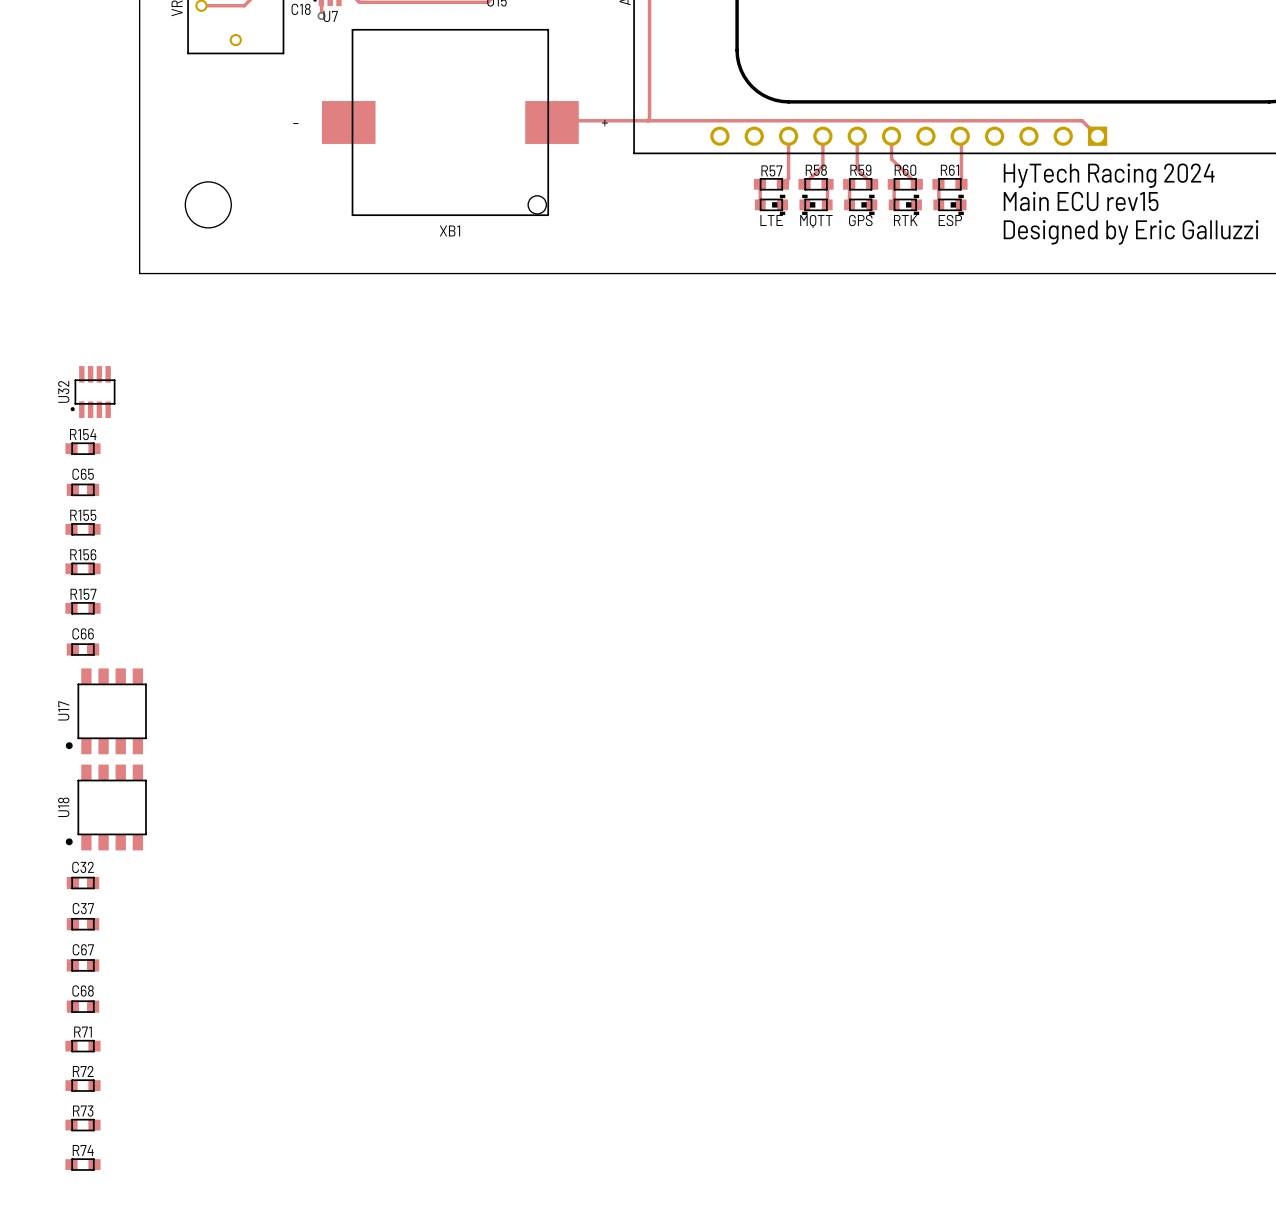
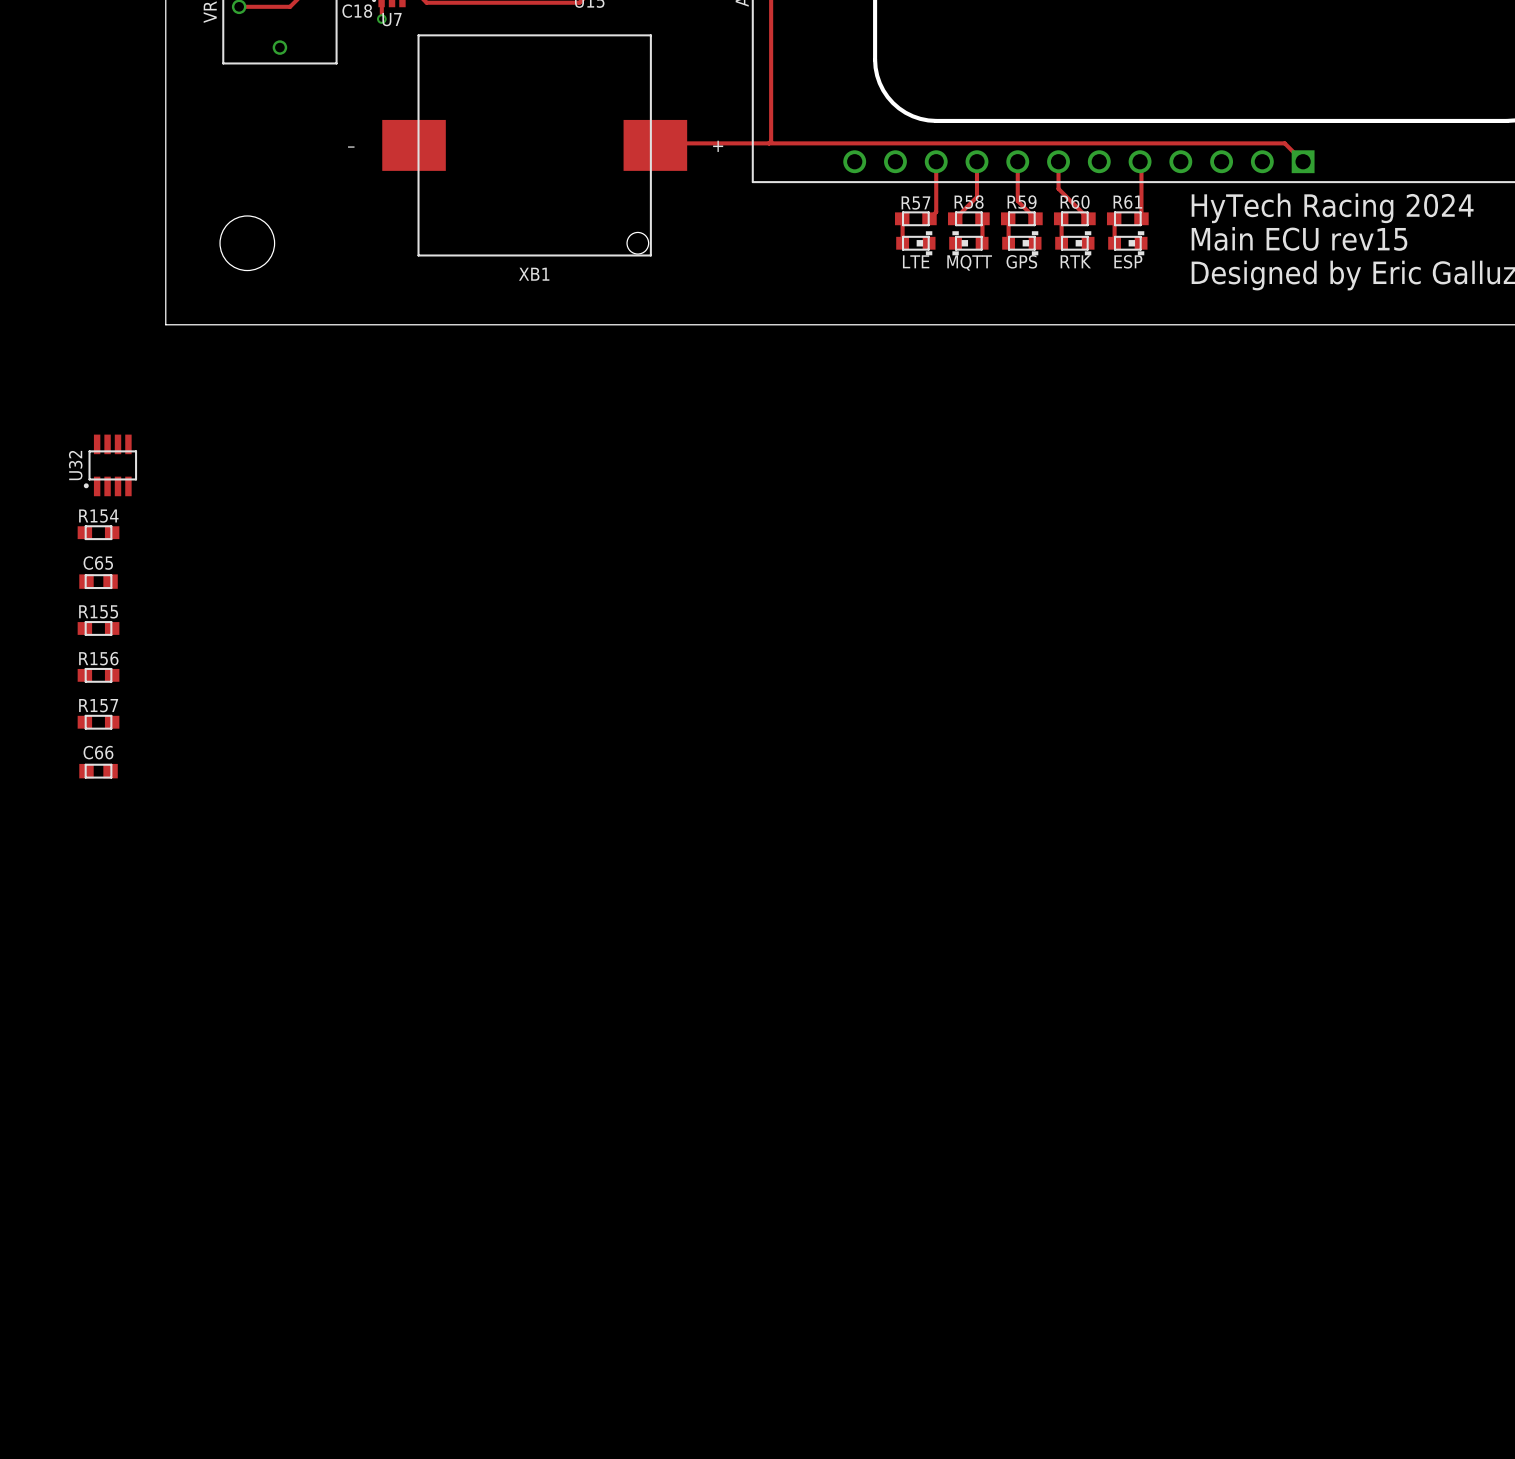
U17: (106, 711) -> none
U18: (106, 807) -> none
C32: (82, 883) -> none
C37: (82, 924) -> none
C67: (82, 965) -> none
C68: (82, 1006) -> none
R71: (82, 1046) -> none
R72: (82, 1085) -> none
R73: (82, 1125) -> none
R74: (82, 1164) -> none

